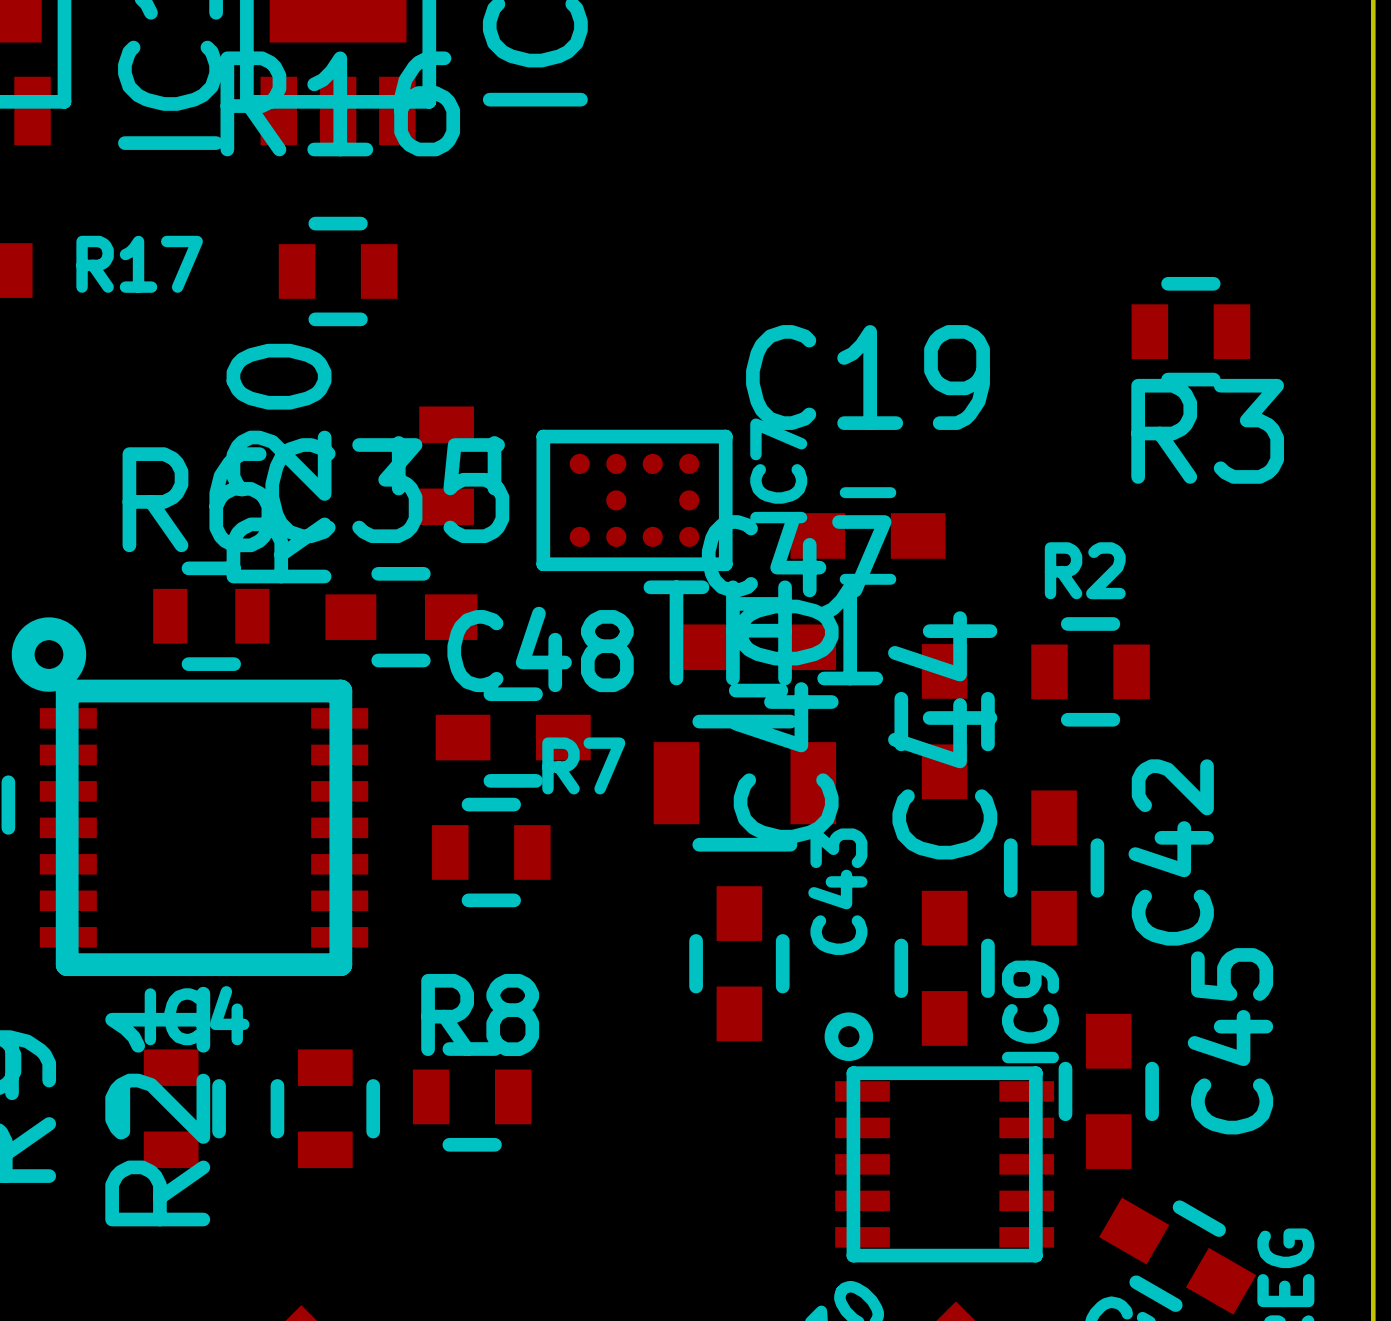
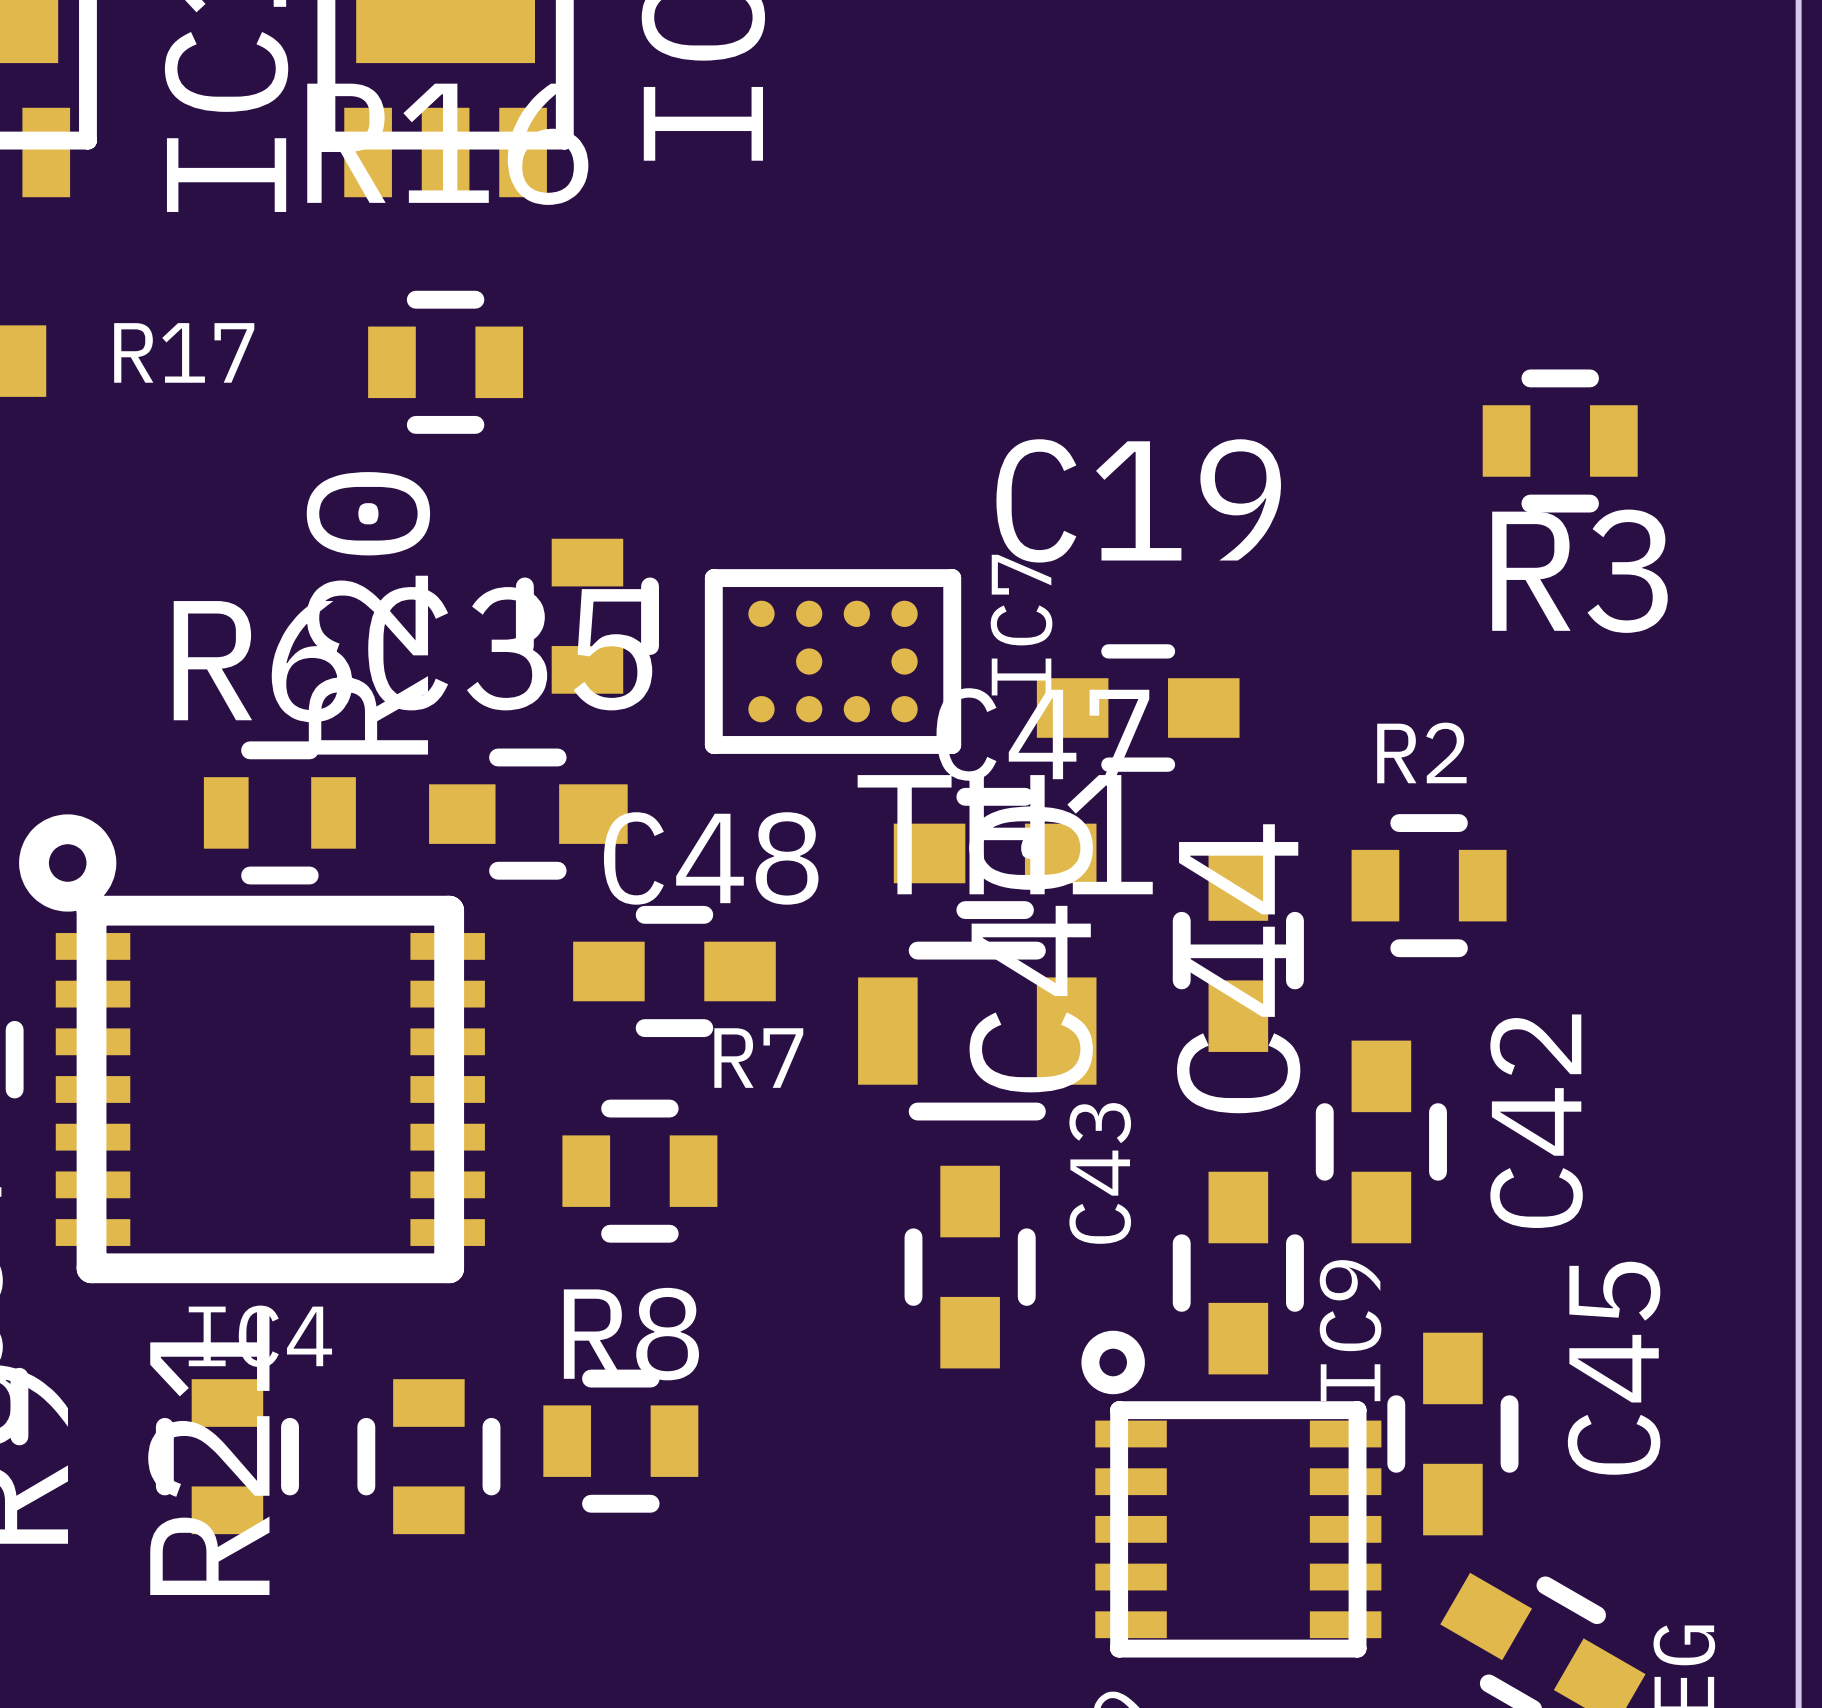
R7 position: (491, 852) -> (639, 1171)

